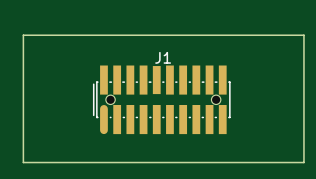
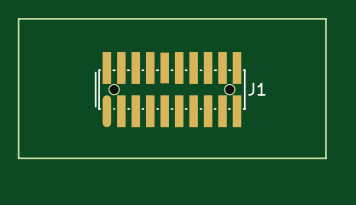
J1 name position: J1 (163, 57) -> J1 (256, 89)

